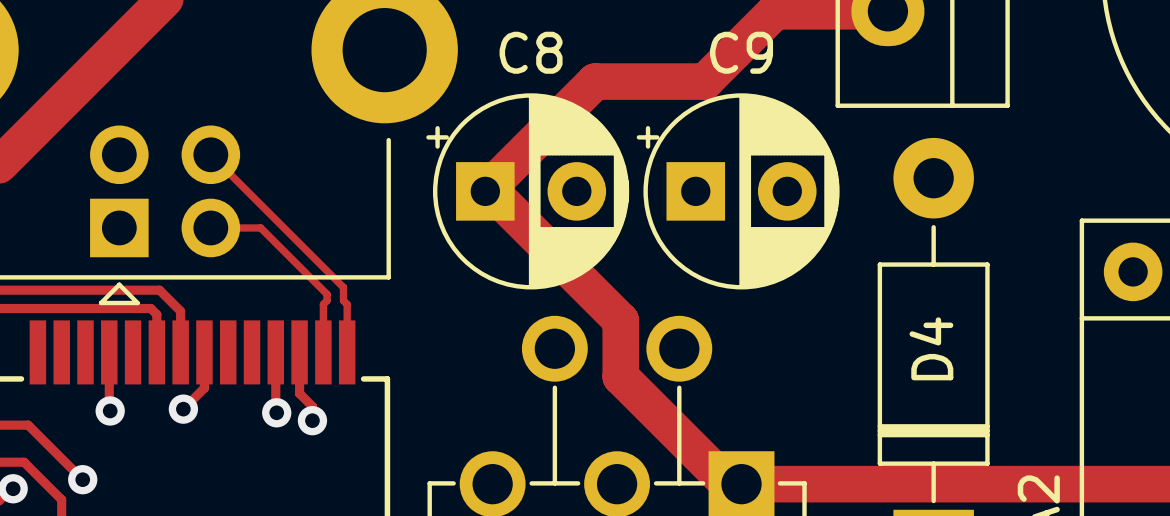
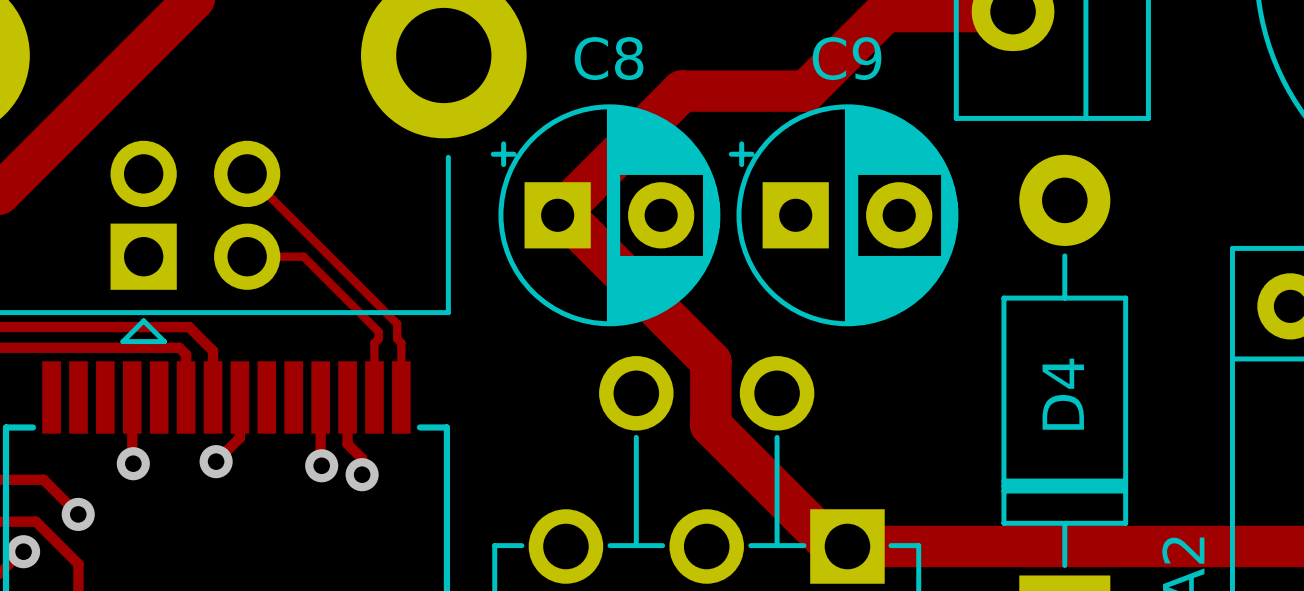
track: (28, 425) (82, 479) -> (40, 479) (43, 479) (78, 514)
via position: (82, 479) -> (78, 514)

